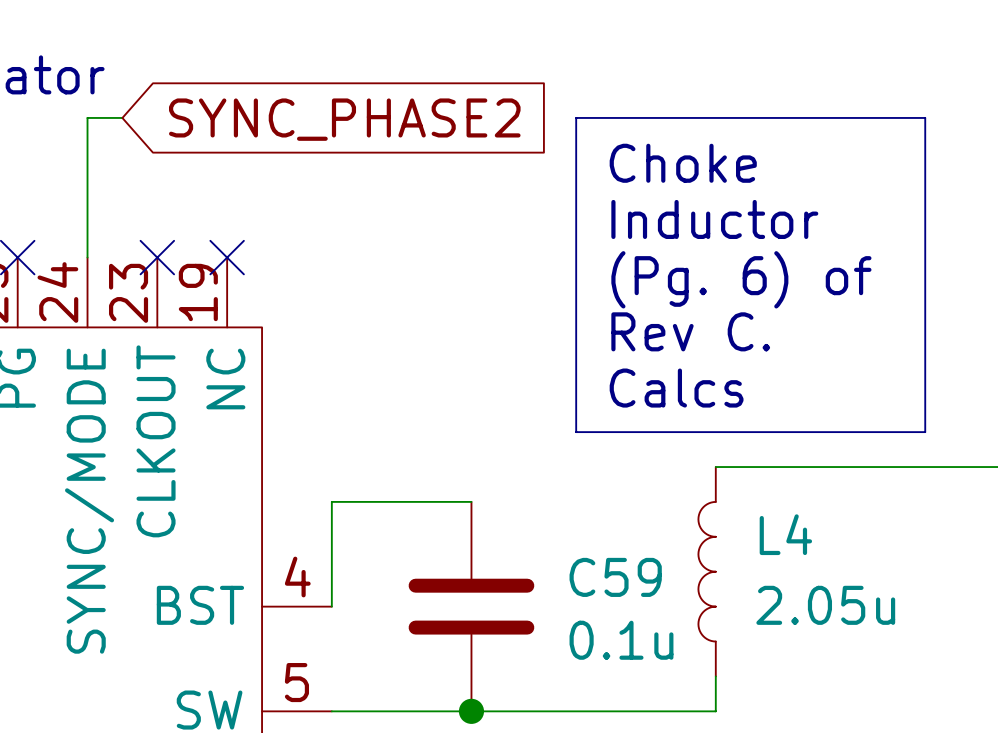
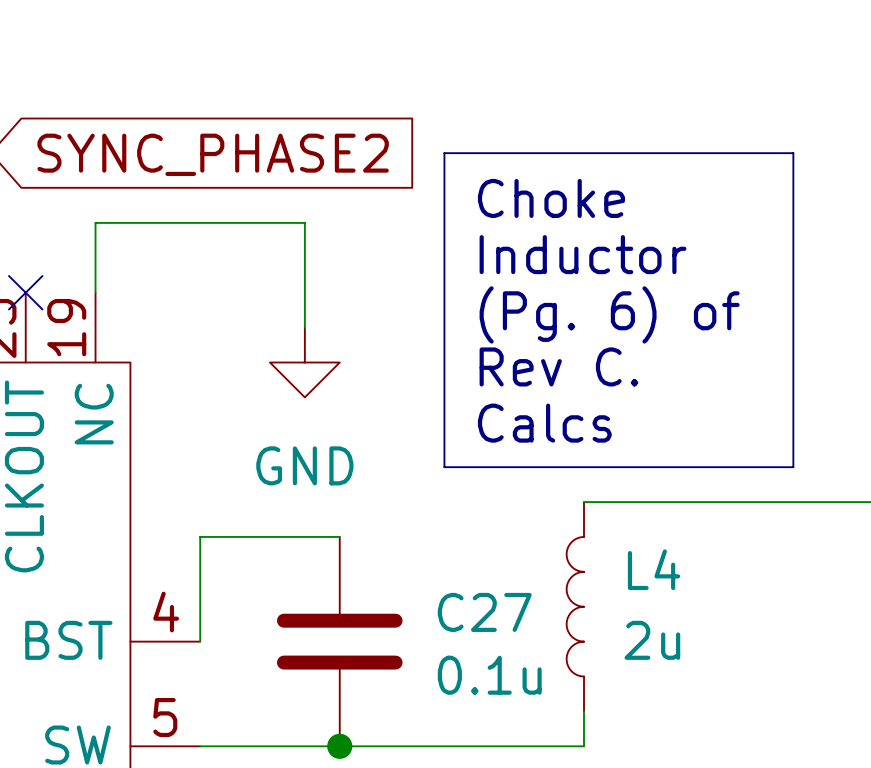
wire: none -> (95, 292) (95, 222) (304, 222) (304, 327)
no-connect mark: (227, 257) -> none
power symbol: none -> GND (304, 362)
C59 name: C59 (615, 577) -> C27 (484, 612)
L4 value: 2.05u (825, 605) -> 2u (652, 640)

